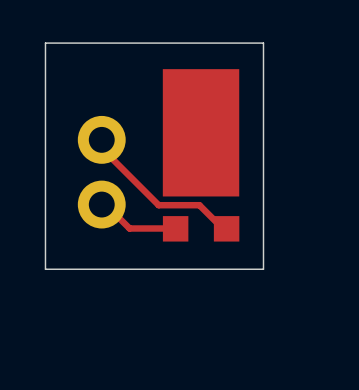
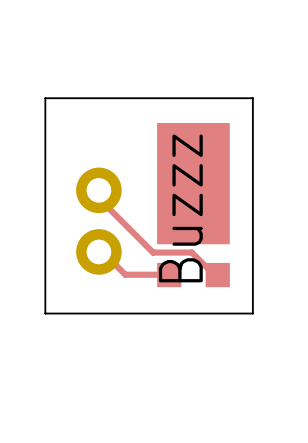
text: none -> Buzzz (180, 208)

